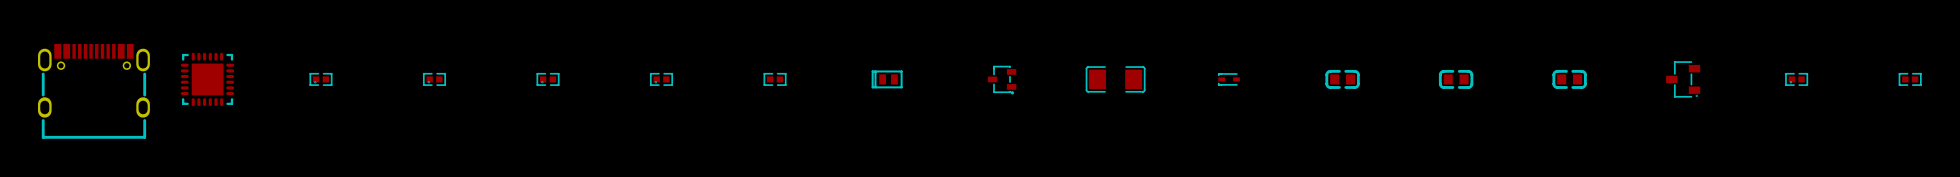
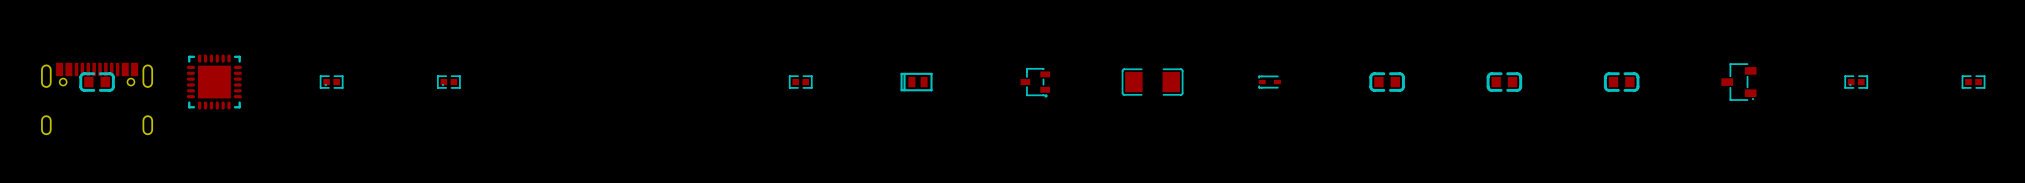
part footprint: [37, 44, 150, 139] -> [41, 62, 154, 136]
part: none -> (97, 82)
part: (548, 79) -> none
part: (661, 79) -> none

